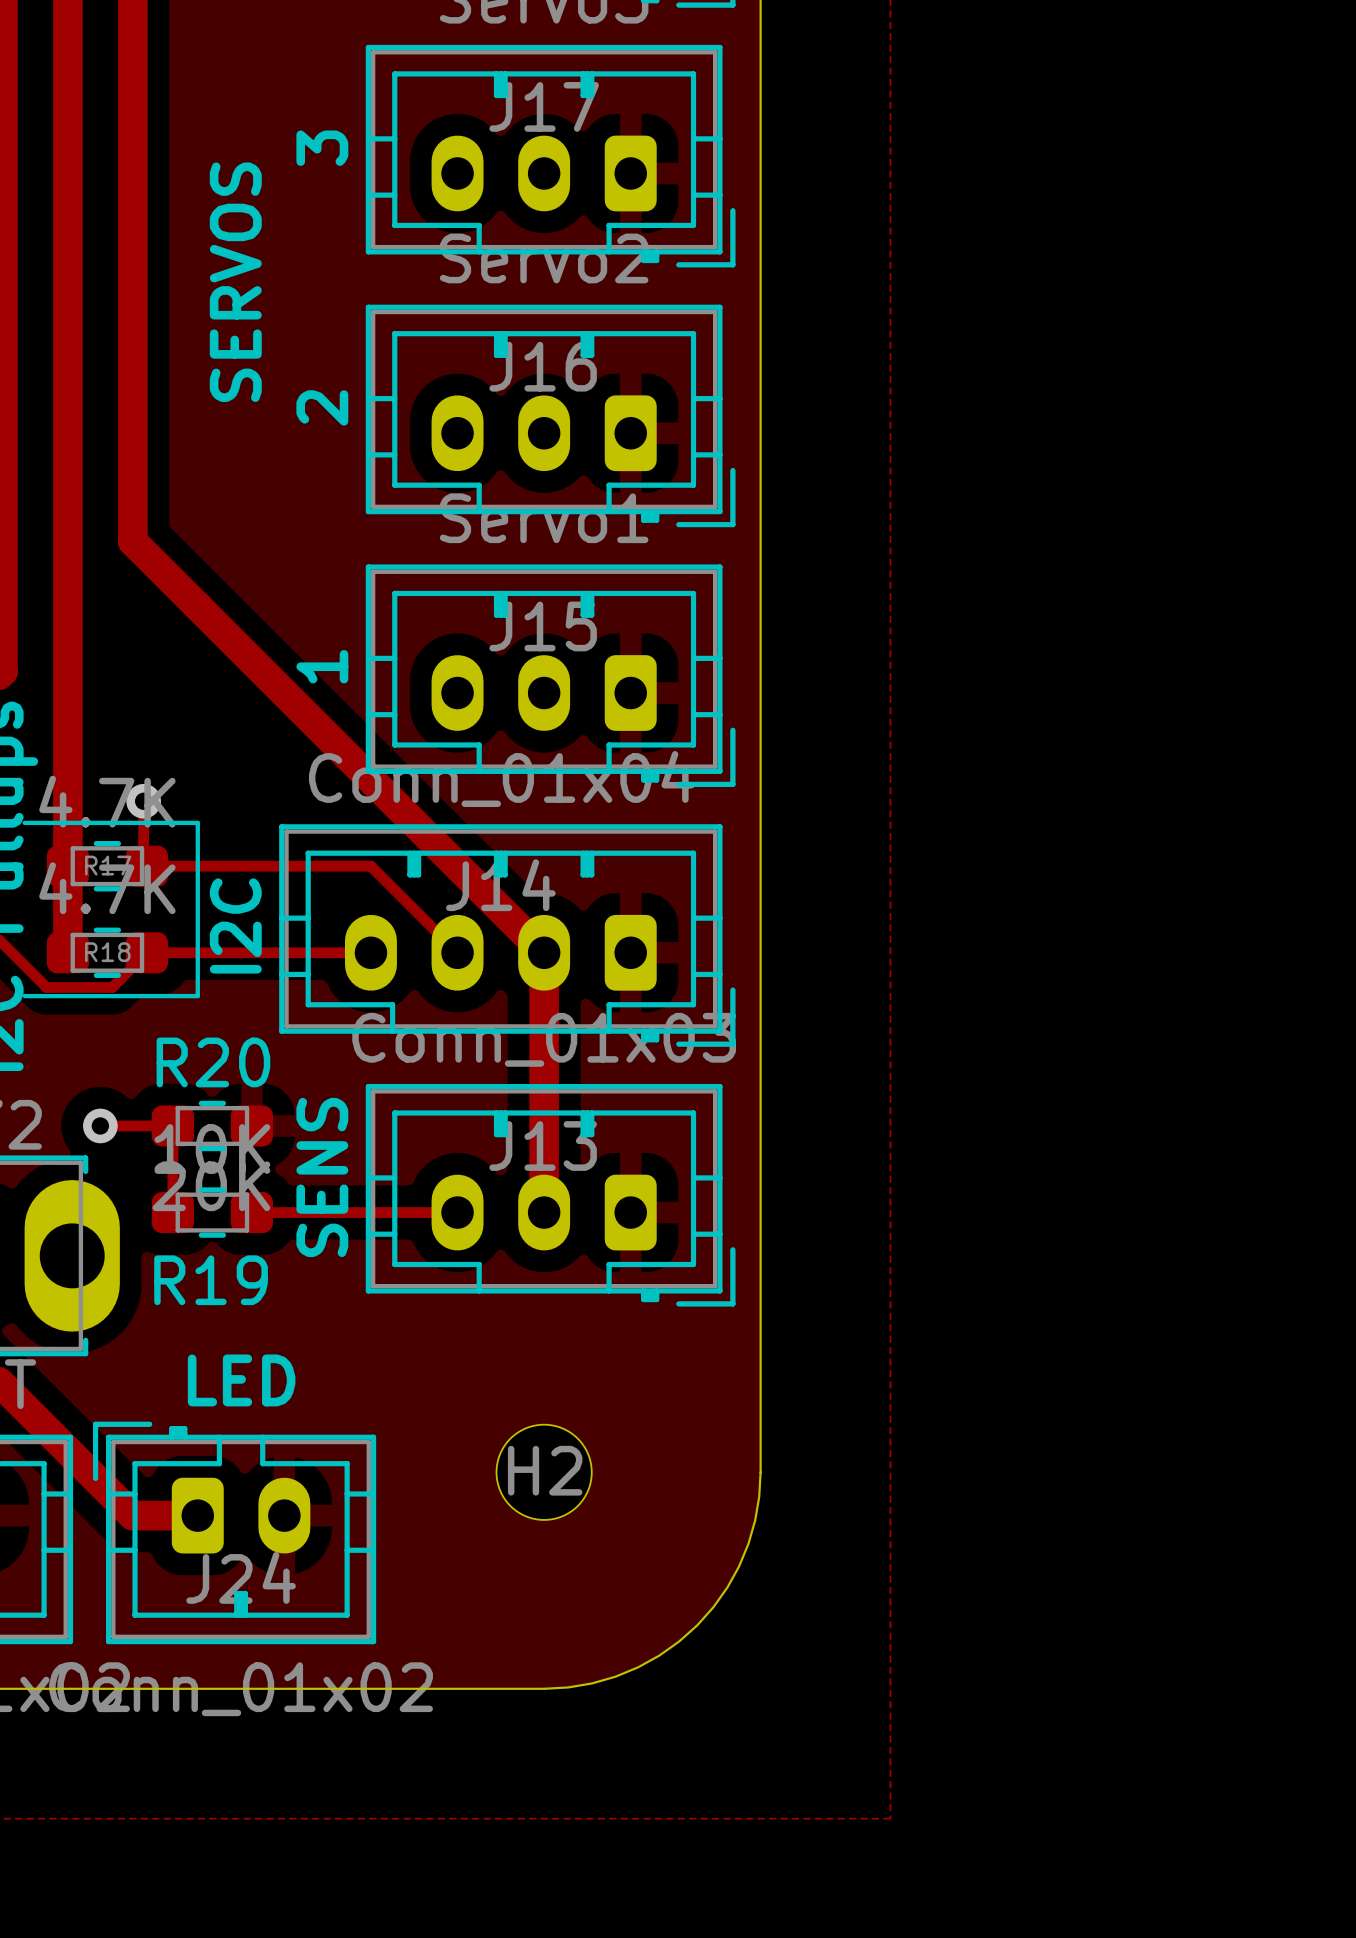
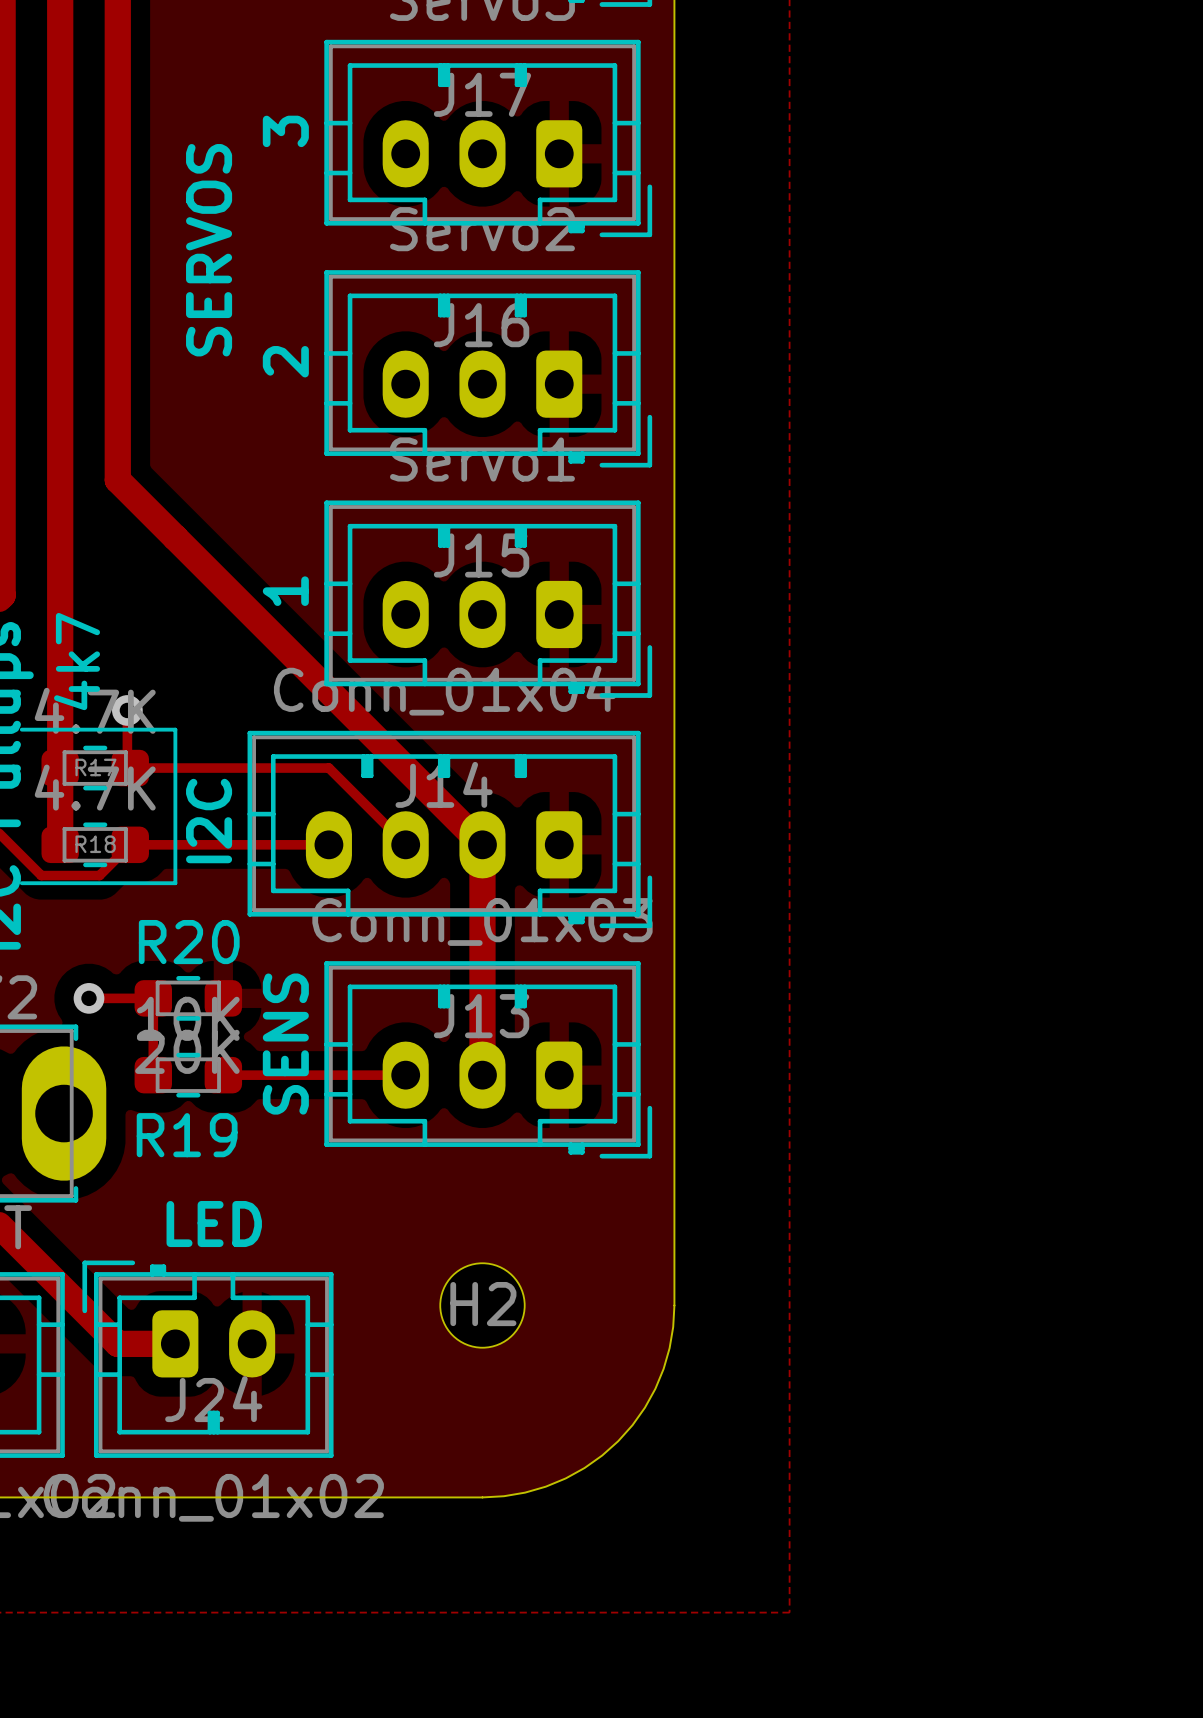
text: none -> 4k7 (77, 661)

